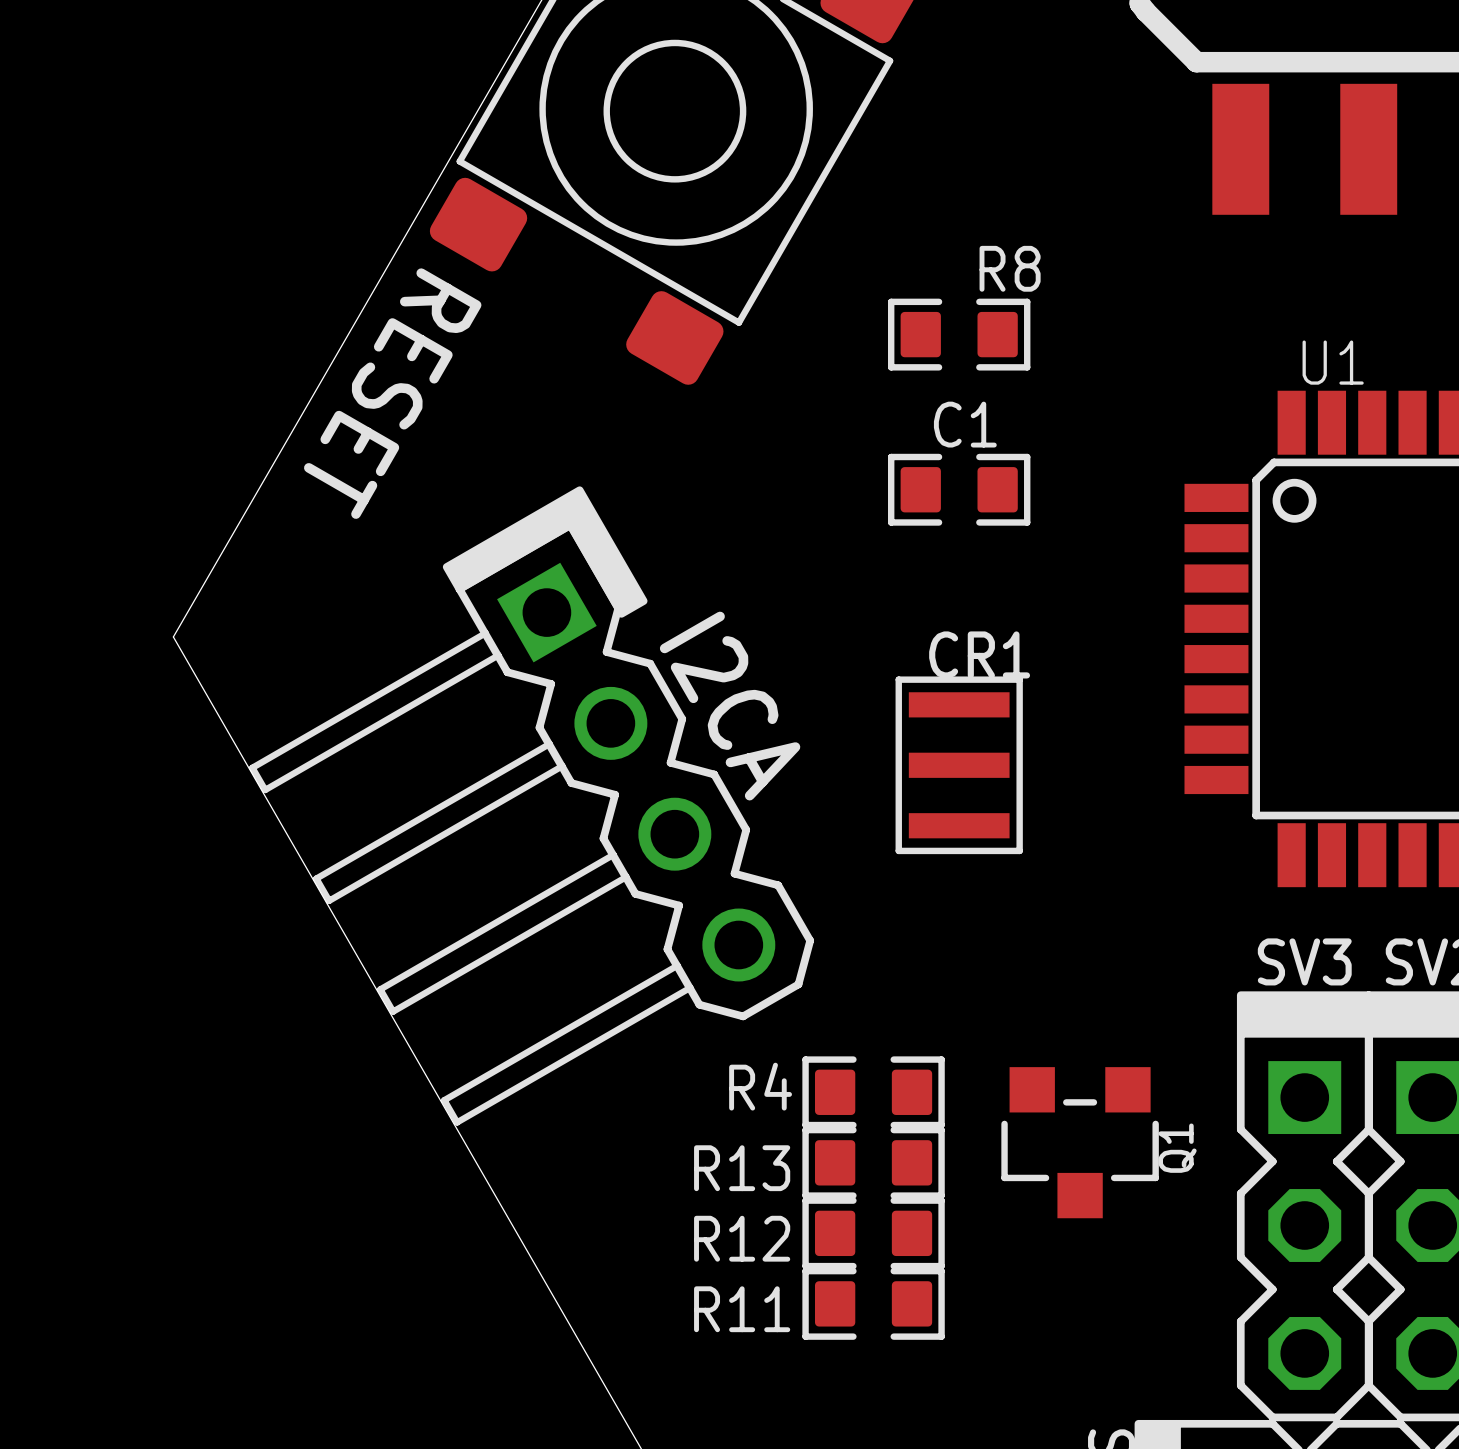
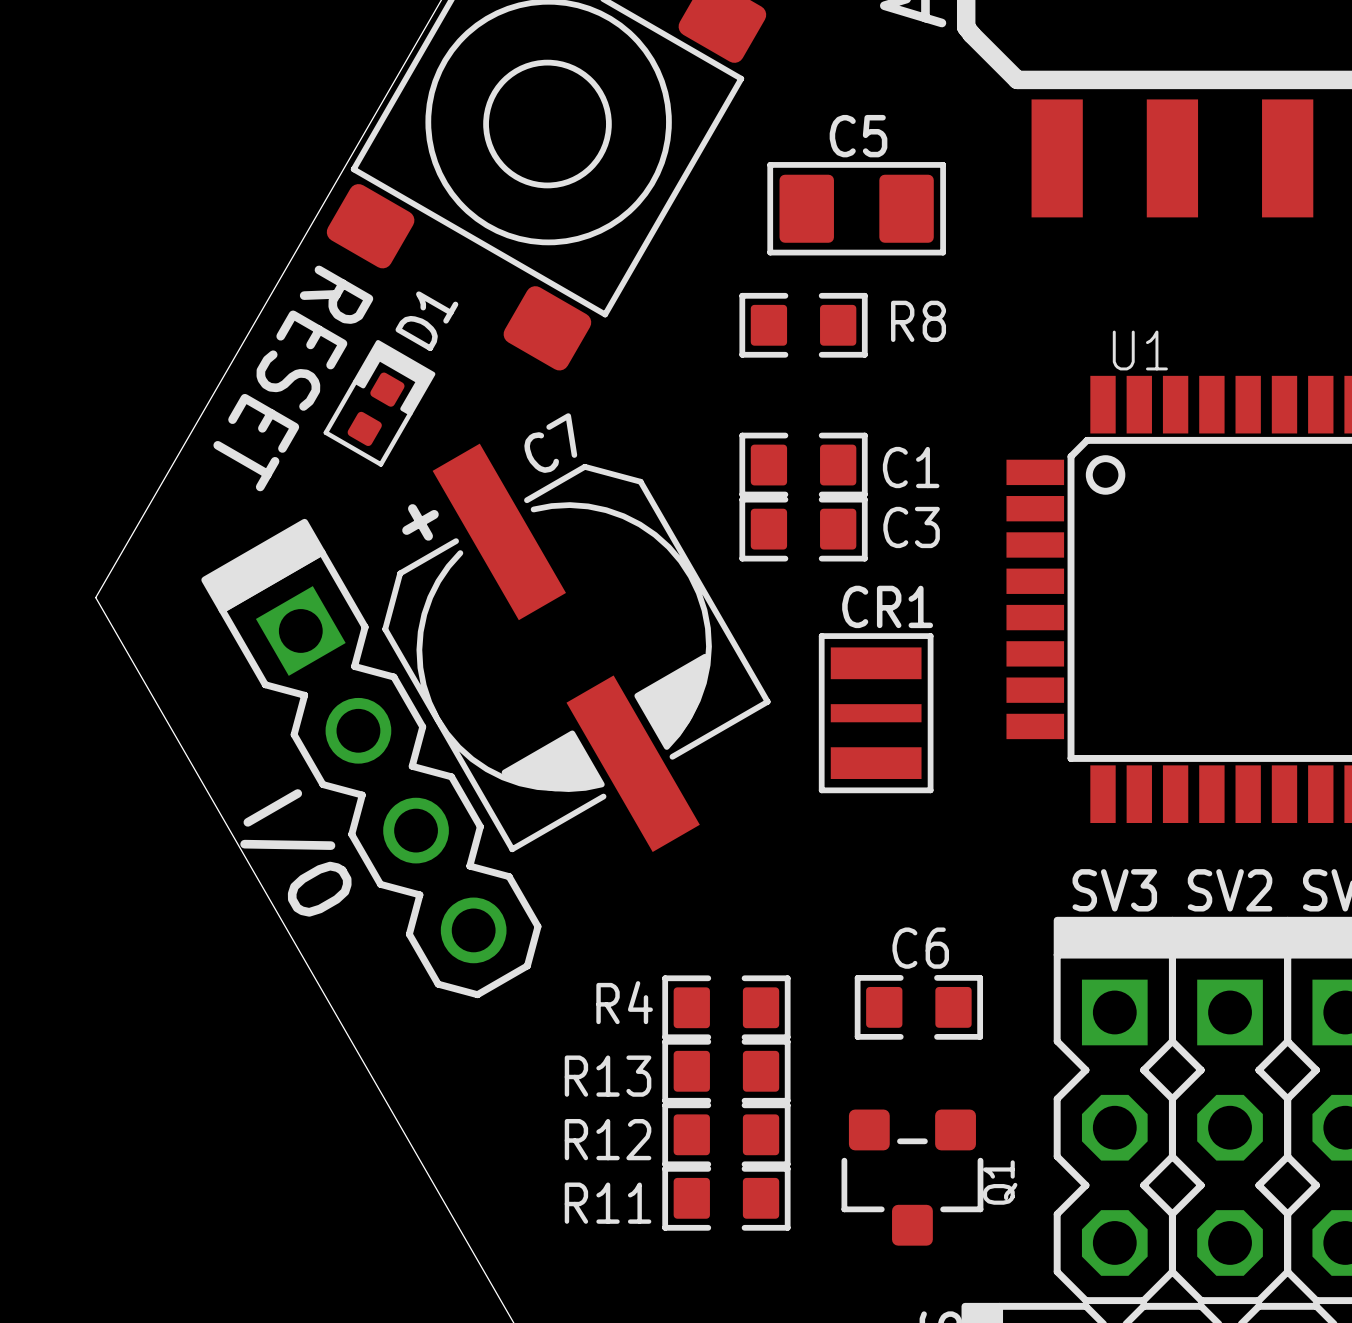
C5: none -> (856, 208)
R8 name position: R8 (1010, 268) -> R8 (918, 321)
D1: none -> (379, 403)
C1 name position: C1 (965, 424) -> C1 (911, 467)
C3: none -> (803, 529)
CR1 footprint: [895, 676, 1023, 855] -> [818, 633, 934, 794]
C7: none -> (576, 647)
I2CA: (531, 806) -> none
I/O: none -> (371, 758)
Q1 footprint: [1001, 1067, 1159, 1219] -> [841, 1109, 984, 1246]
C6: none -> (918, 1007)

